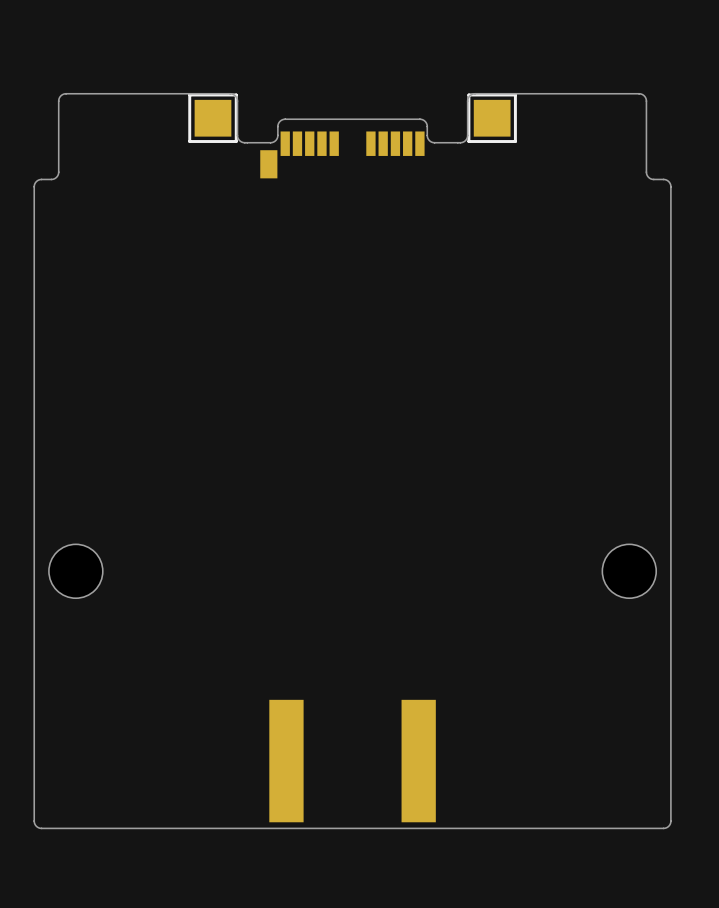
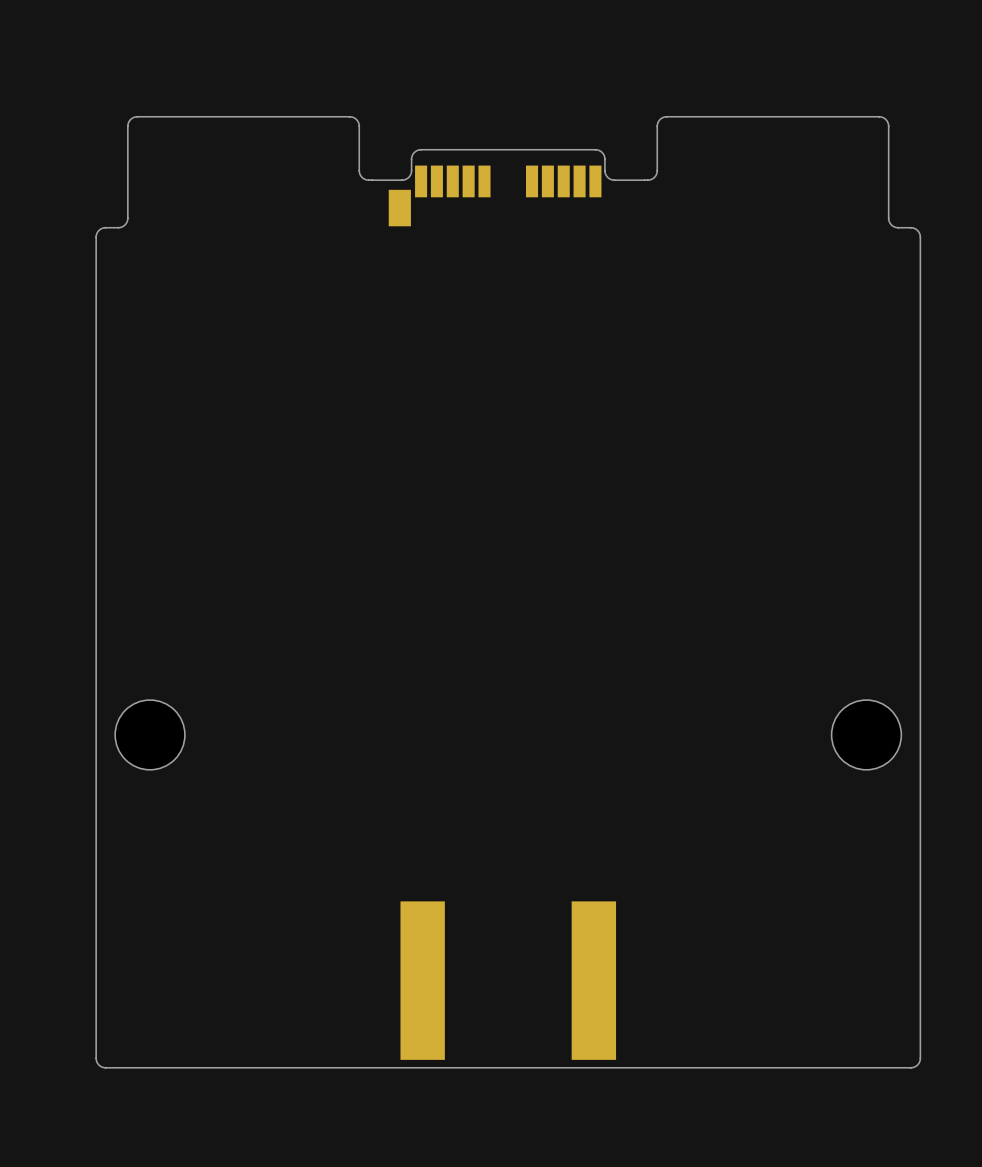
part: (212, 118) -> none
part: (492, 118) -> none

